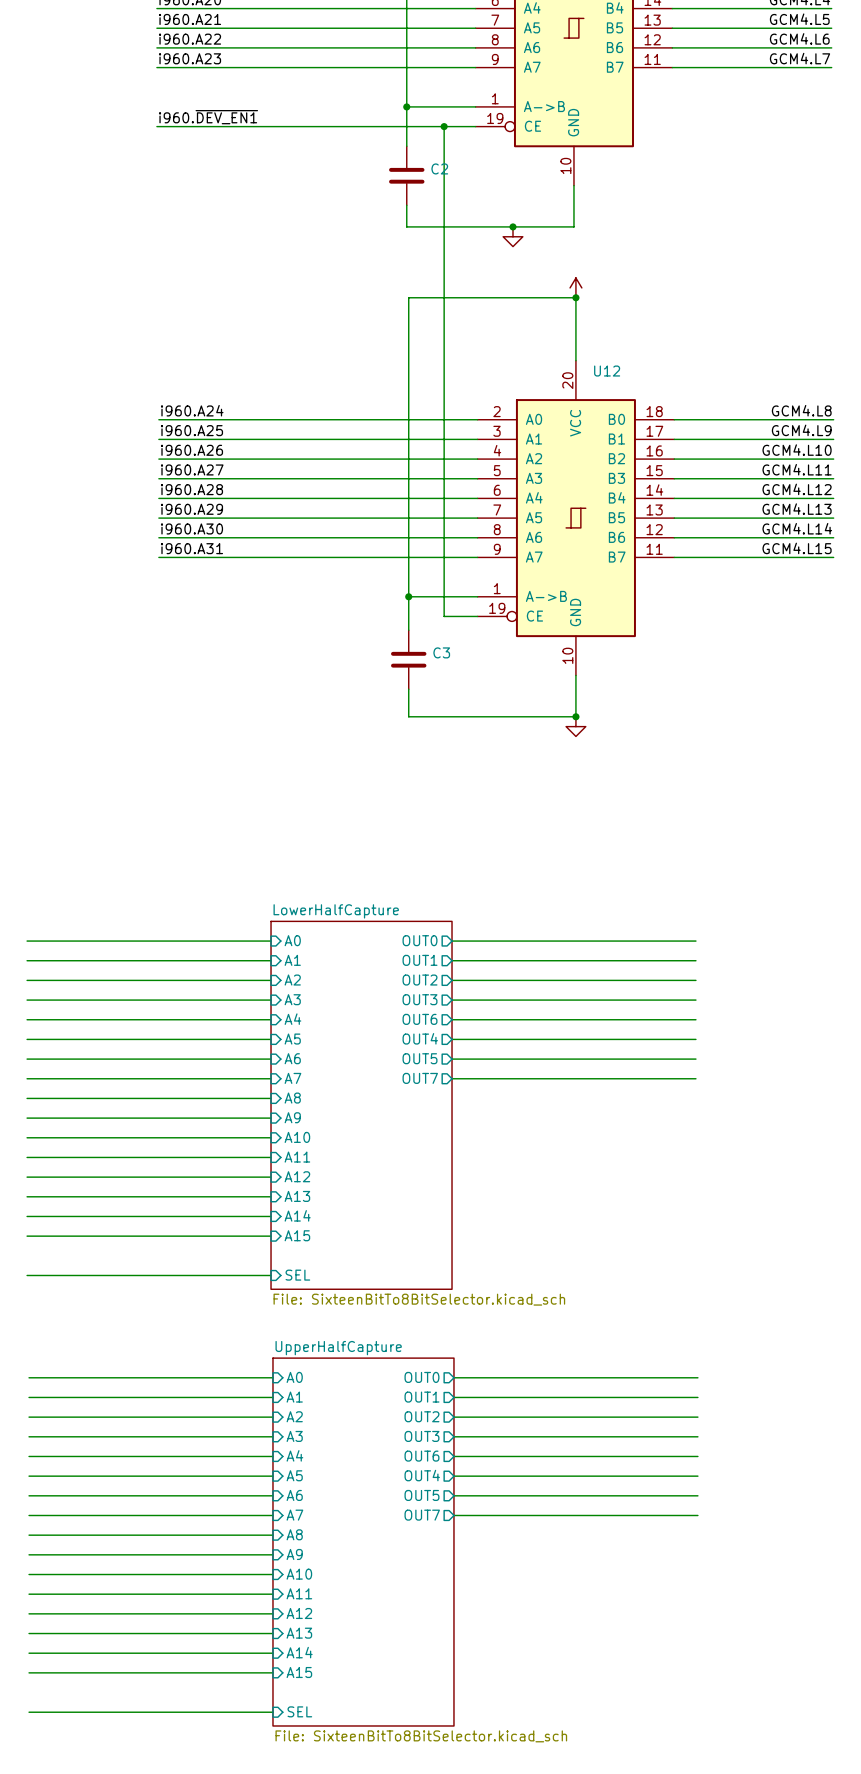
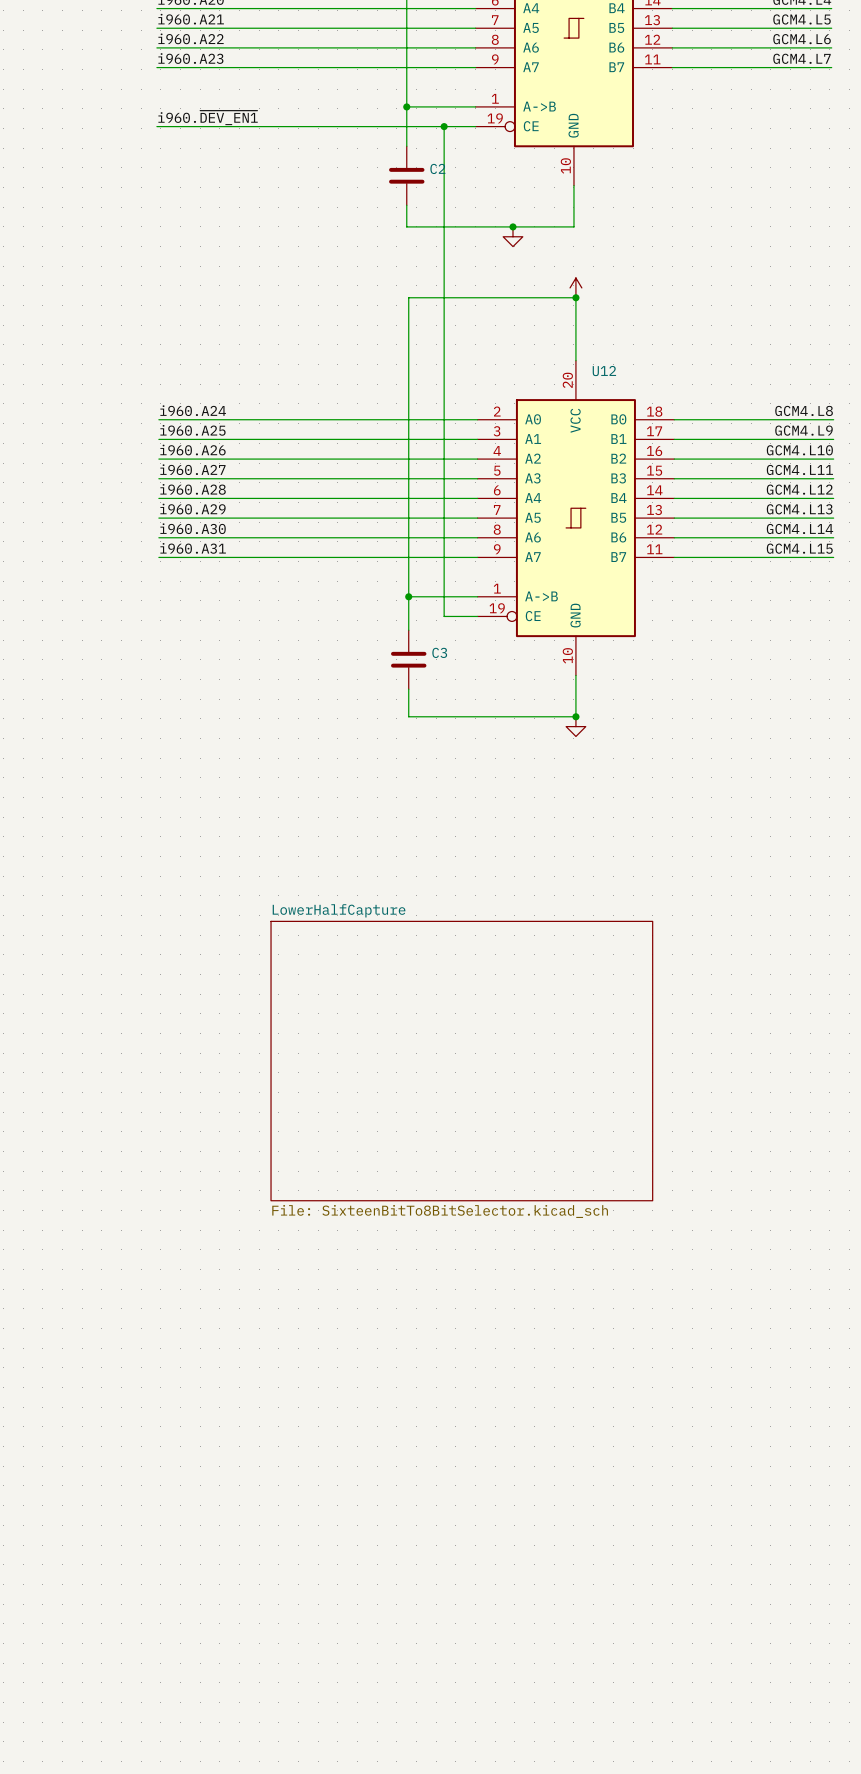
sheet pin: A0 (292, 940) -> none
sheet pin: OUT0 (420, 940) -> none
wire: (27, 941) (271, 941) -> none
wire: (452, 941) (695, 941) -> none
wire: (27, 960) (271, 960) -> none
sheet pin: A1 (292, 960) -> none
sheet pin: OUT1 (420, 960) -> none
wire: (452, 960) (695, 960) -> none
wire: (27, 980) (271, 980) -> none
sheet pin: A2 (292, 980) -> none
sheet pin: OUT2 (420, 980) -> none
wire: (452, 980) (695, 980) -> none
sheet pin: A3 (292, 999) -> none
sheet pin: OUT3 (420, 999) -> none
wire: (27, 1000) (271, 1000) -> none
wire: (452, 1000) (695, 1000) -> none
wire: (27, 1019) (271, 1019) -> none
sheet pin: A4 (292, 1019) -> none
sheet pin: OUT6 (420, 1019) -> none
wire: (452, 1019) (695, 1019) -> none
sheet pin: OUT4 (420, 1038) -> none
wire: (27, 1039) (271, 1039) -> none
sheet pin: A5 (292, 1039) -> none
wire: (452, 1039) (695, 1039) -> none
sheet pin: A6 (292, 1058) -> none
sheet pin: OUT5 (420, 1058) -> none
wire: (27, 1059) (271, 1059) -> none
wire: (452, 1059) (695, 1059) -> none
sheet LowerHalfCapture: none -> File: SixteenBitTo8BitSelector.kicad_sch (461, 1061)
wire: (27, 1078) (271, 1078) -> none
sheet pin: A7 (292, 1078) -> none
sheet pin: OUT7 (420, 1078) -> none
wire: (452, 1078) (695, 1078) -> none
wire: (27, 1098) (271, 1098) -> none
sheet pin: A8 (292, 1098) -> none
sheet LowerHalfCapture: File: SixteenBitTo8BitSelector.kicad_sch (361, 1105) -> none
sheet pin: A9 (292, 1117) -> none
wire: (27, 1118) (271, 1118) -> none
wire: (27, 1137) (271, 1137) -> none
sheet pin: A10 (297, 1137) -> none
wire: (27, 1157) (271, 1157) -> none
sheet pin: A11 (297, 1157) -> none
sheet pin: A12 (297, 1176) -> none
wire: (27, 1177) (271, 1177) -> none
wire: (27, 1196) (271, 1196) -> none
sheet pin: A13 (297, 1196) -> none
sheet pin: A14 (297, 1215) -> none
wire: (27, 1216) (271, 1216) -> none
sheet pin: A15 (297, 1235) -> none
wire: (27, 1236) (271, 1236) -> none
wire: (27, 1275) (271, 1275) -> none
sheet pin: SEL (297, 1275) -> none
wire: (29, 1377) (272, 1377) -> none
sheet pin: A0 (294, 1377) -> none
sheet pin: OUT0 (421, 1377) -> none
wire: (453, 1377) (697, 1377) -> none
wire: (29, 1397) (272, 1397) -> none
sheet pin: A1 (294, 1397) -> none
sheet pin: OUT1 (421, 1397) -> none
wire: (453, 1397) (697, 1397) -> none
sheet pin: A2 (294, 1416) -> none
sheet pin: OUT2 (421, 1416) -> none
wire: (29, 1417) (272, 1417) -> none
wire: (453, 1417) (697, 1417) -> none
wire: (29, 1436) (272, 1436) -> none
sheet pin: A3 (294, 1436) -> none
sheet pin: OUT3 (421, 1436) -> none
wire: (453, 1436) (697, 1436) -> none
sheet pin: A4 (294, 1455) -> none
wire: (29, 1456) (272, 1456) -> none
sheet pin: OUT6 (421, 1456) -> none
wire: (453, 1456) (697, 1456) -> none
sheet pin: A5 (294, 1475) -> none
sheet pin: OUT4 (422, 1475) -> none
wire: (29, 1476) (272, 1476) -> none
wire: (453, 1476) (697, 1476) -> none
wire: (29, 1495) (272, 1495) -> none
sheet pin: A6 (294, 1495) -> none
sheet pin: OUT5 (421, 1495) -> none
wire: (453, 1495) (697, 1495) -> none
wire: (29, 1515) (272, 1515) -> none
sheet pin: A7 (294, 1515) -> none
sheet pin: OUT7 (422, 1515) -> none
wire: (453, 1515) (697, 1515) -> none
sheet pin: A8 (294, 1534) -> none
wire: (29, 1535) (272, 1535) -> none
sheet UpperHalfCapture: File: SixteenBitTo8BitSelector.kicad_sch (363, 1542) -> none
wire: (29, 1554) (272, 1554) -> none
sheet pin: A9 (294, 1554) -> none
wire: (29, 1574) (272, 1574) -> none
sheet pin: A10 (299, 1574) -> none
sheet pin: A11 (299, 1593) -> none
wire: (29, 1594) (272, 1594) -> none
wire: (29, 1613) (272, 1613) -> none
sheet pin: A12 (299, 1613) -> none
wire: (29, 1633) (272, 1633) -> none
sheet pin: A13 (299, 1633) -> none
sheet pin: A14 (299, 1652) -> none
wire: (29, 1653) (272, 1653) -> none
wire: (29, 1672) (272, 1672) -> none
sheet pin: A15 (299, 1672) -> none
sheet pin: SEL (299, 1711) -> none
wire: (29, 1712) (272, 1712) -> none

